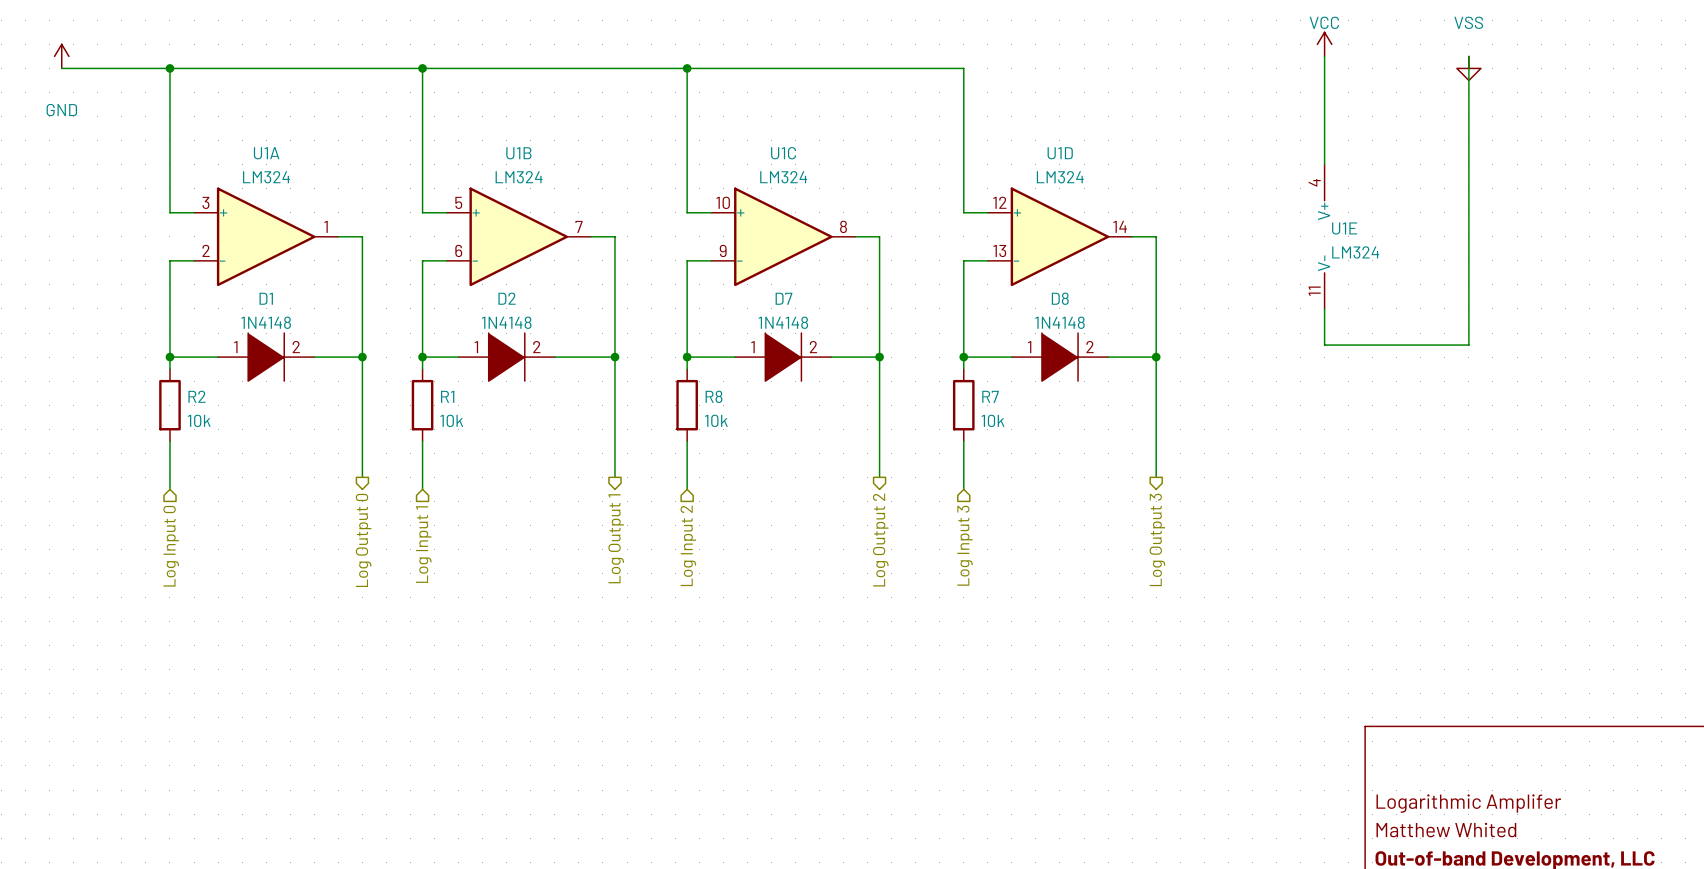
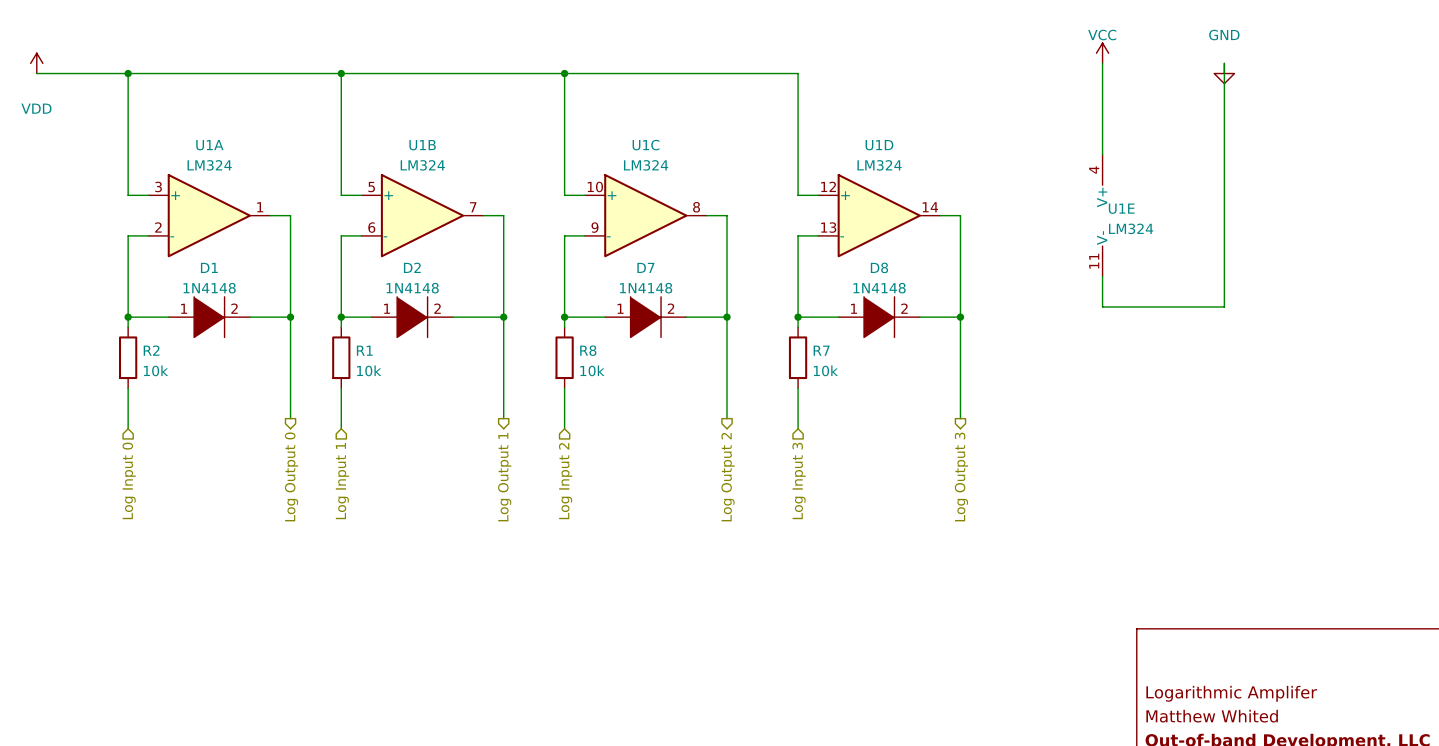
power symbol: GND (61, 56) -> VDD (36, 63)
power symbol: VSS (1468, 68) -> GND (1224, 73)

